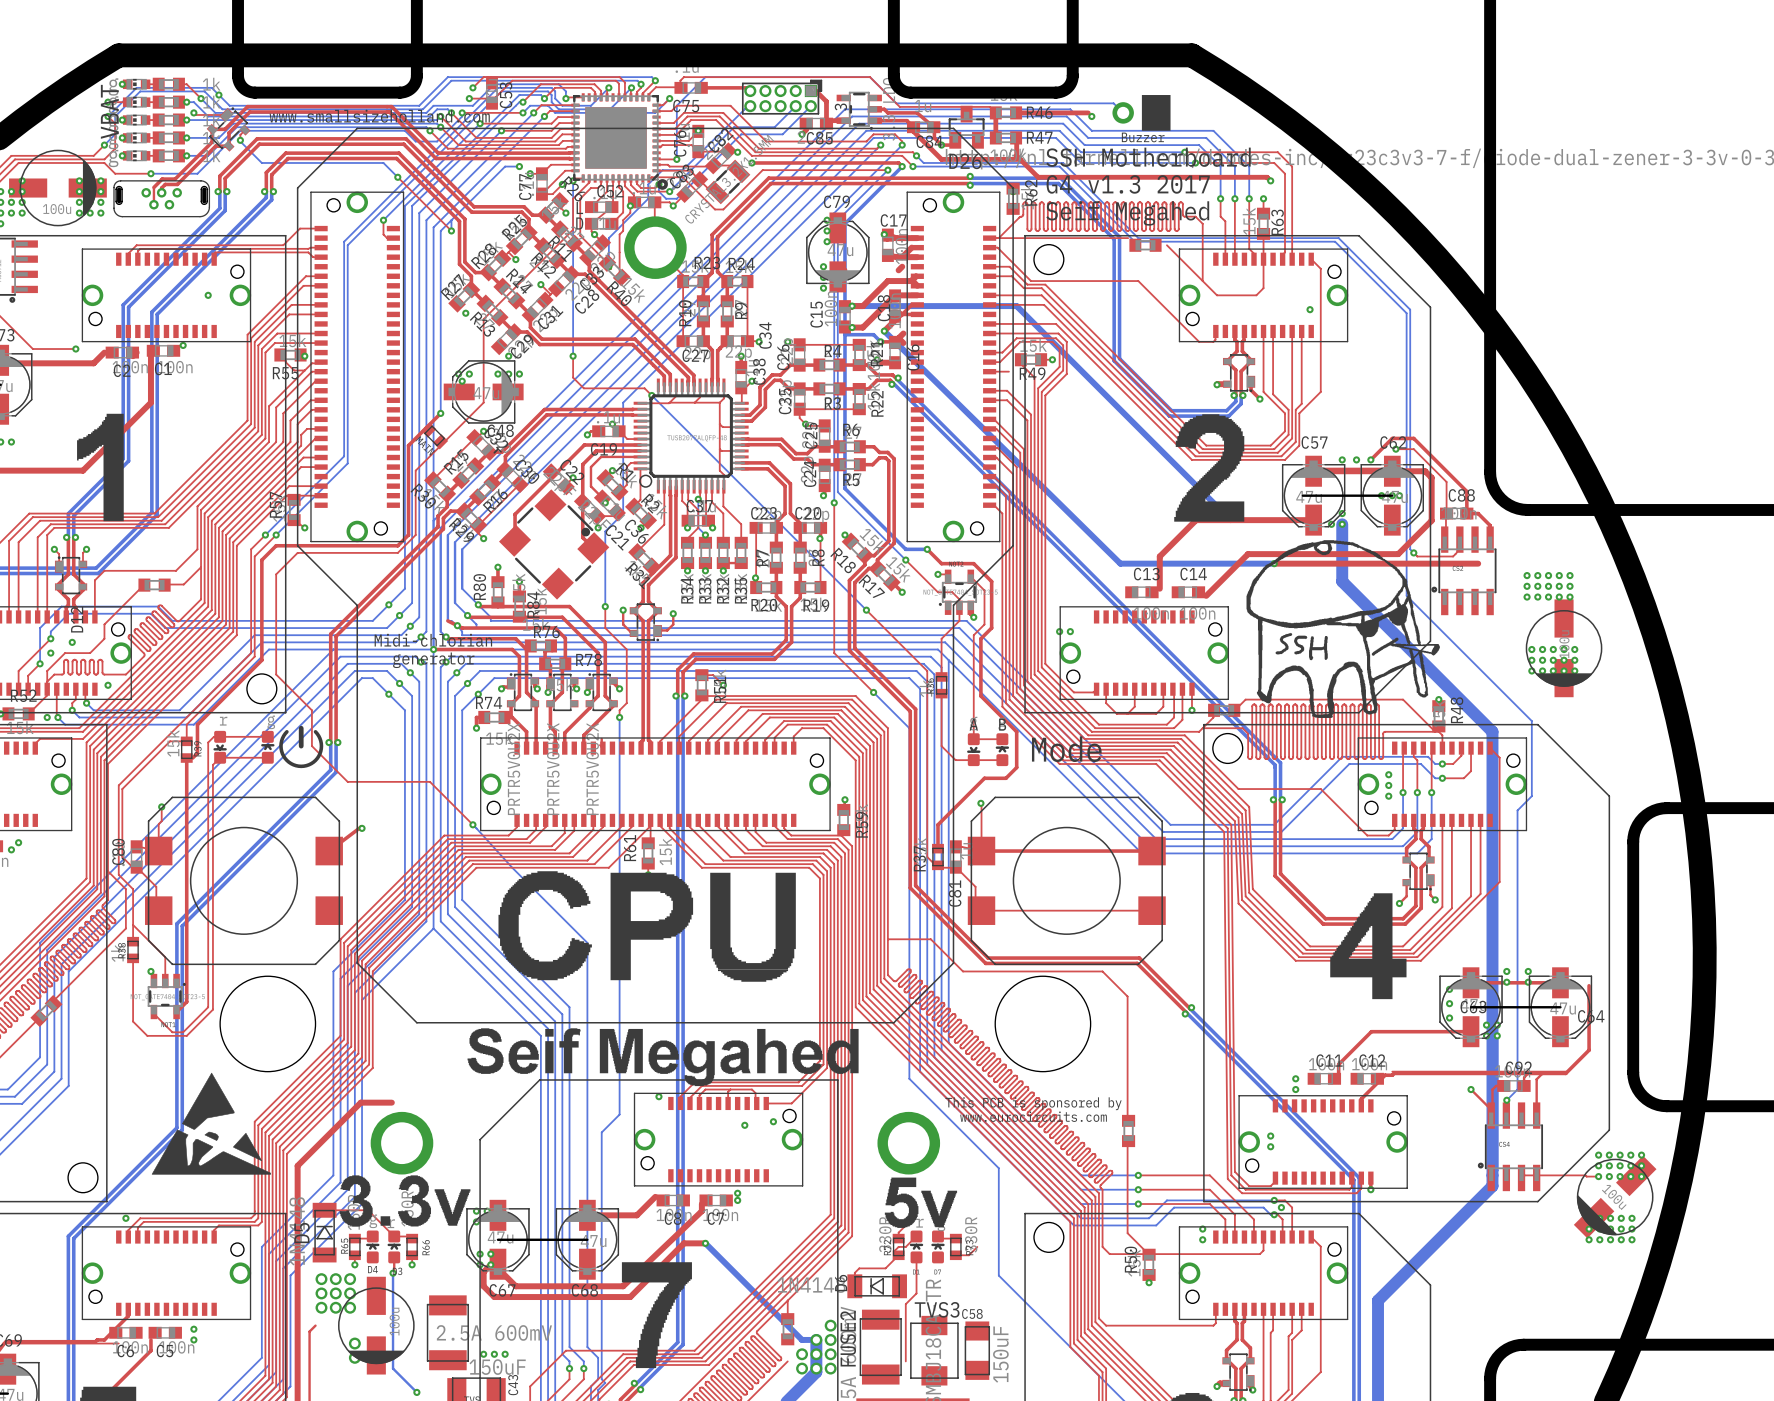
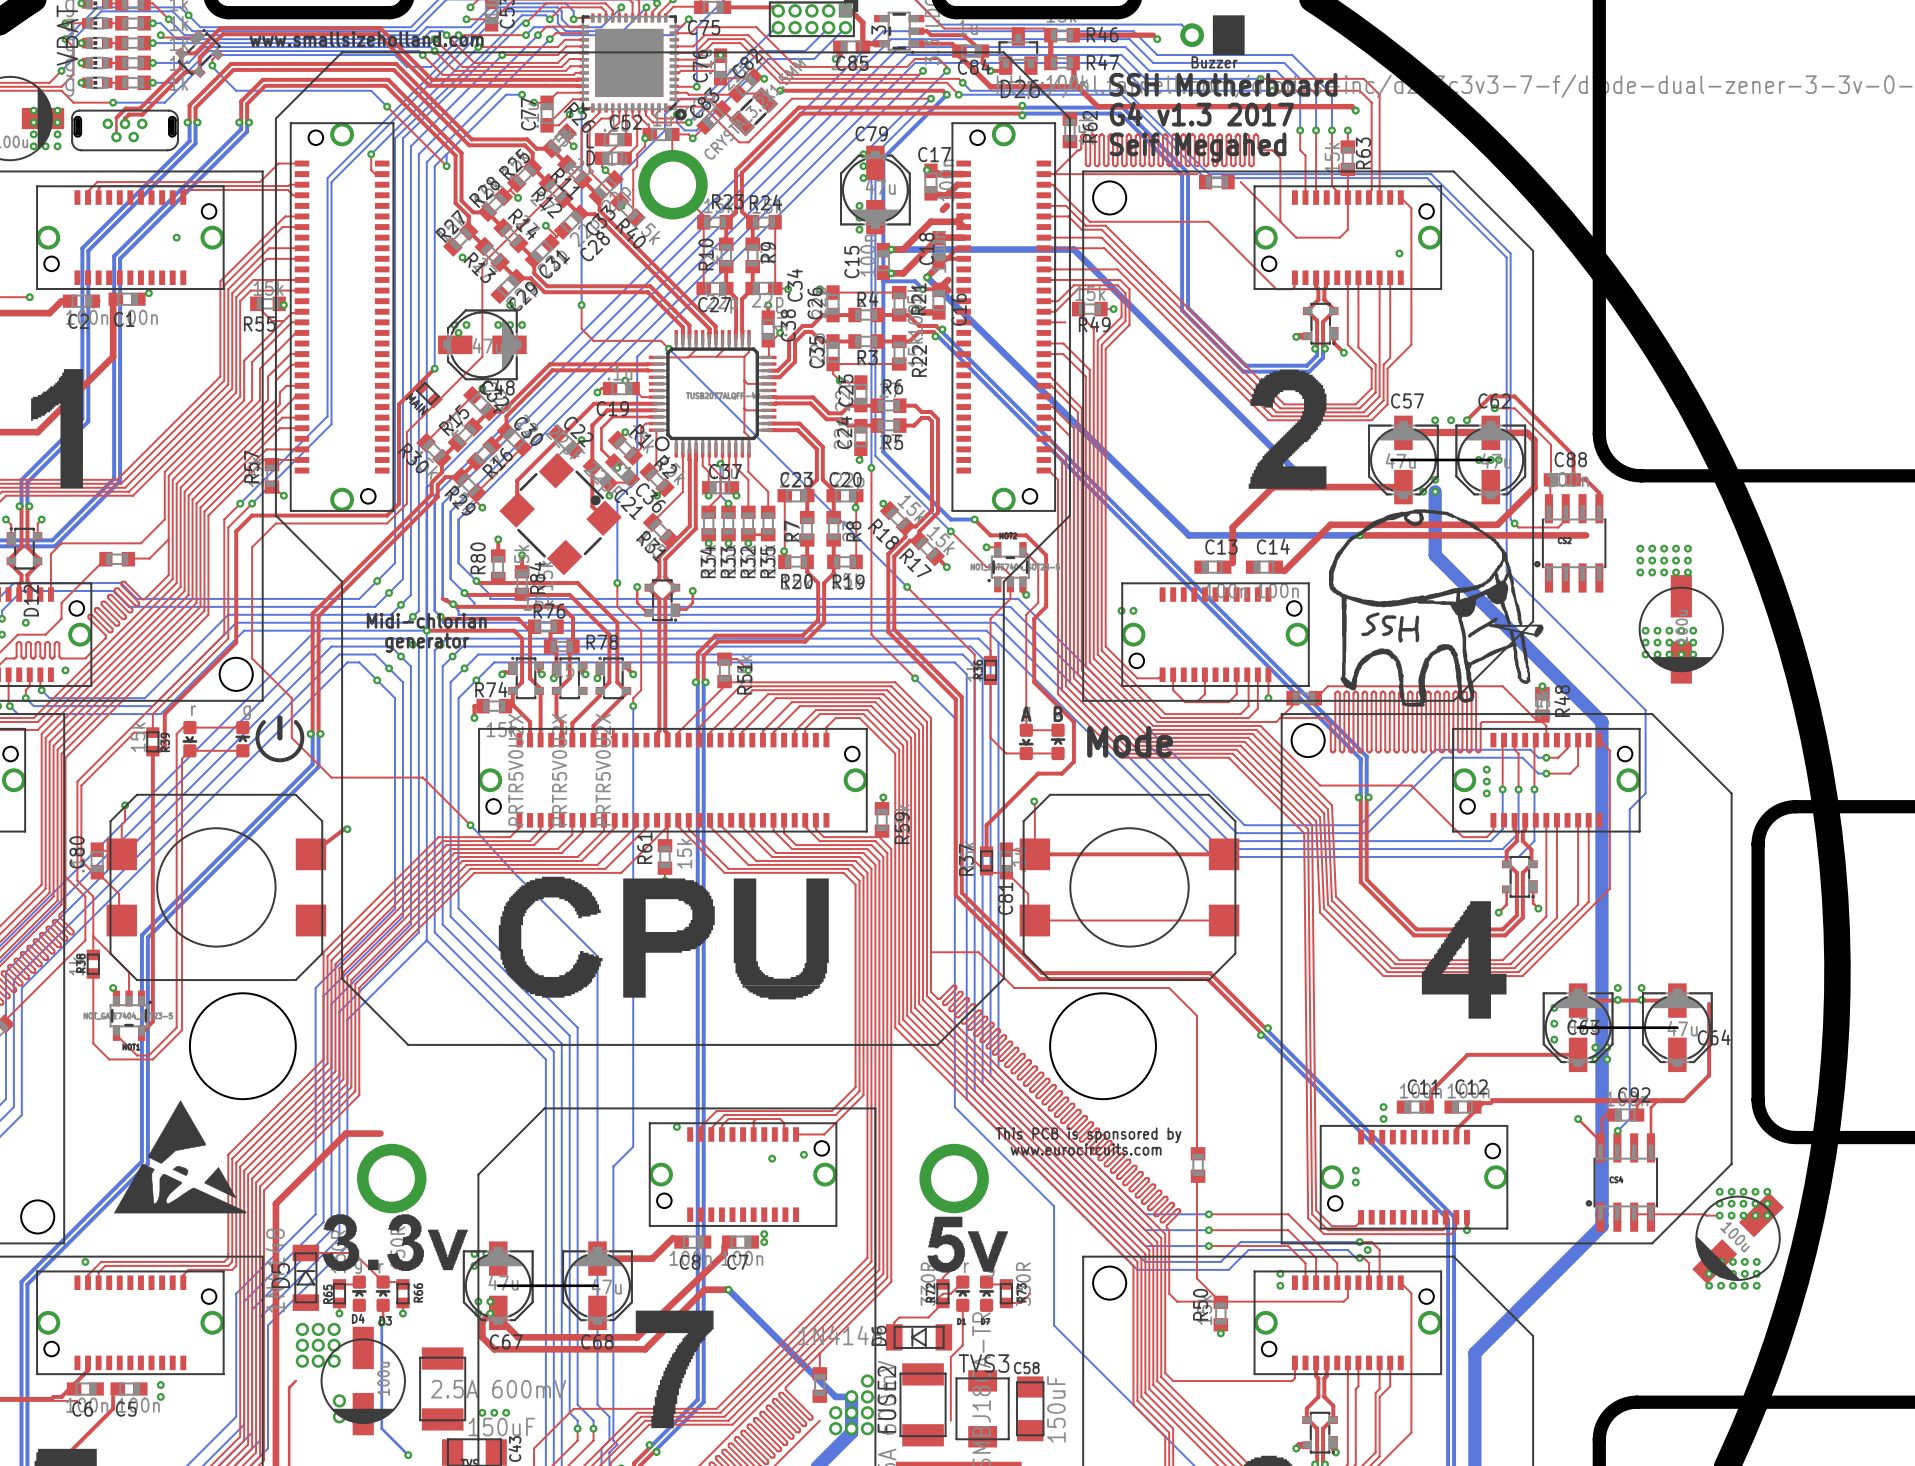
drawing: [467, 1028, 581, 1074] -> none
drawing: [599, 1028, 859, 1087] -> none

